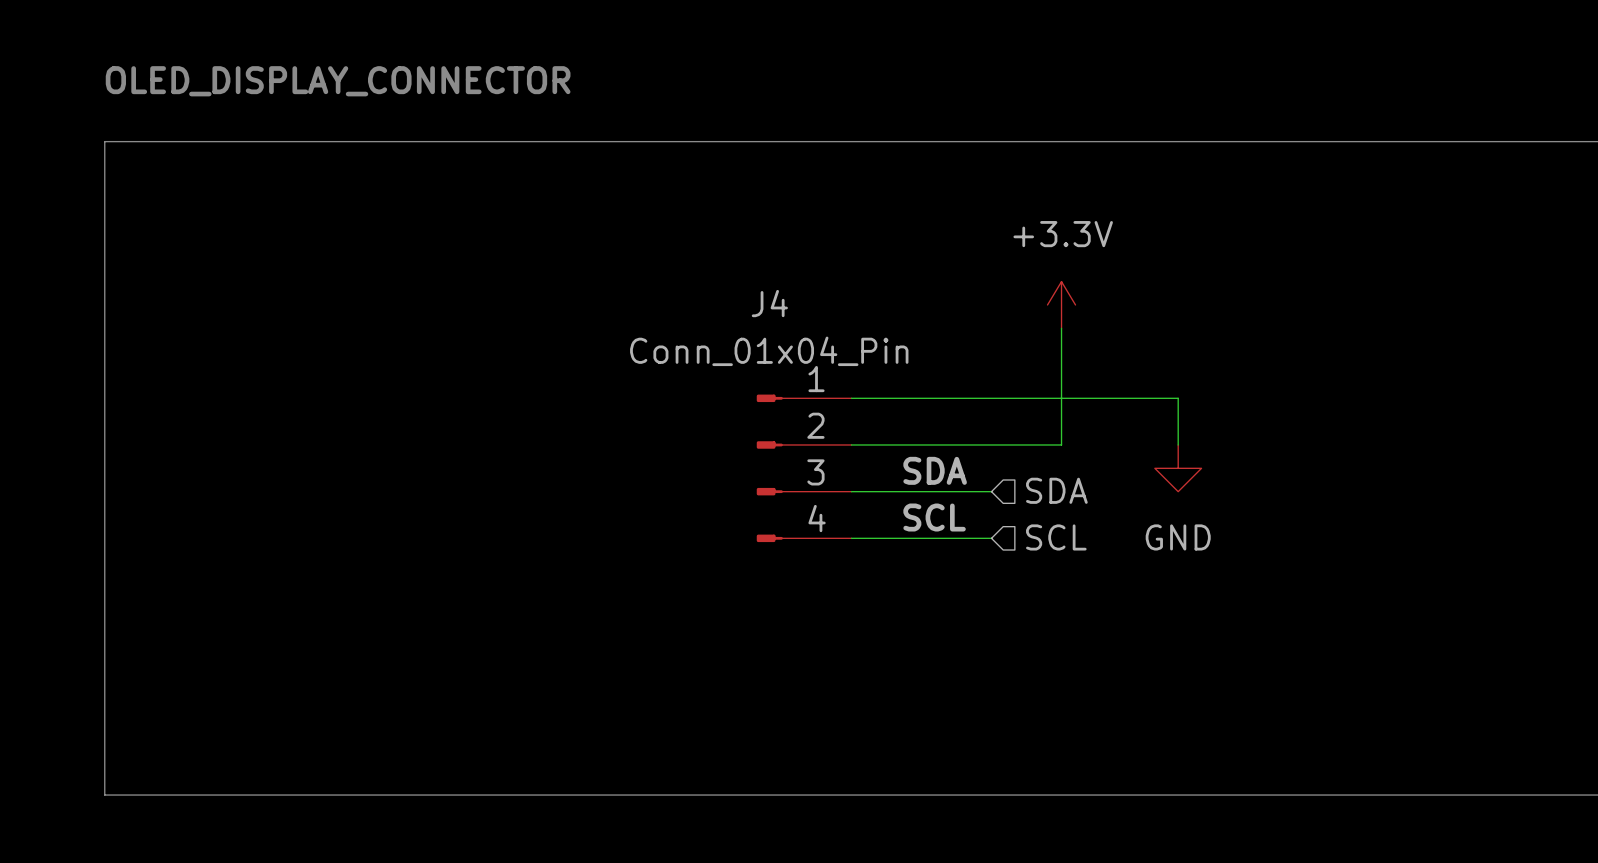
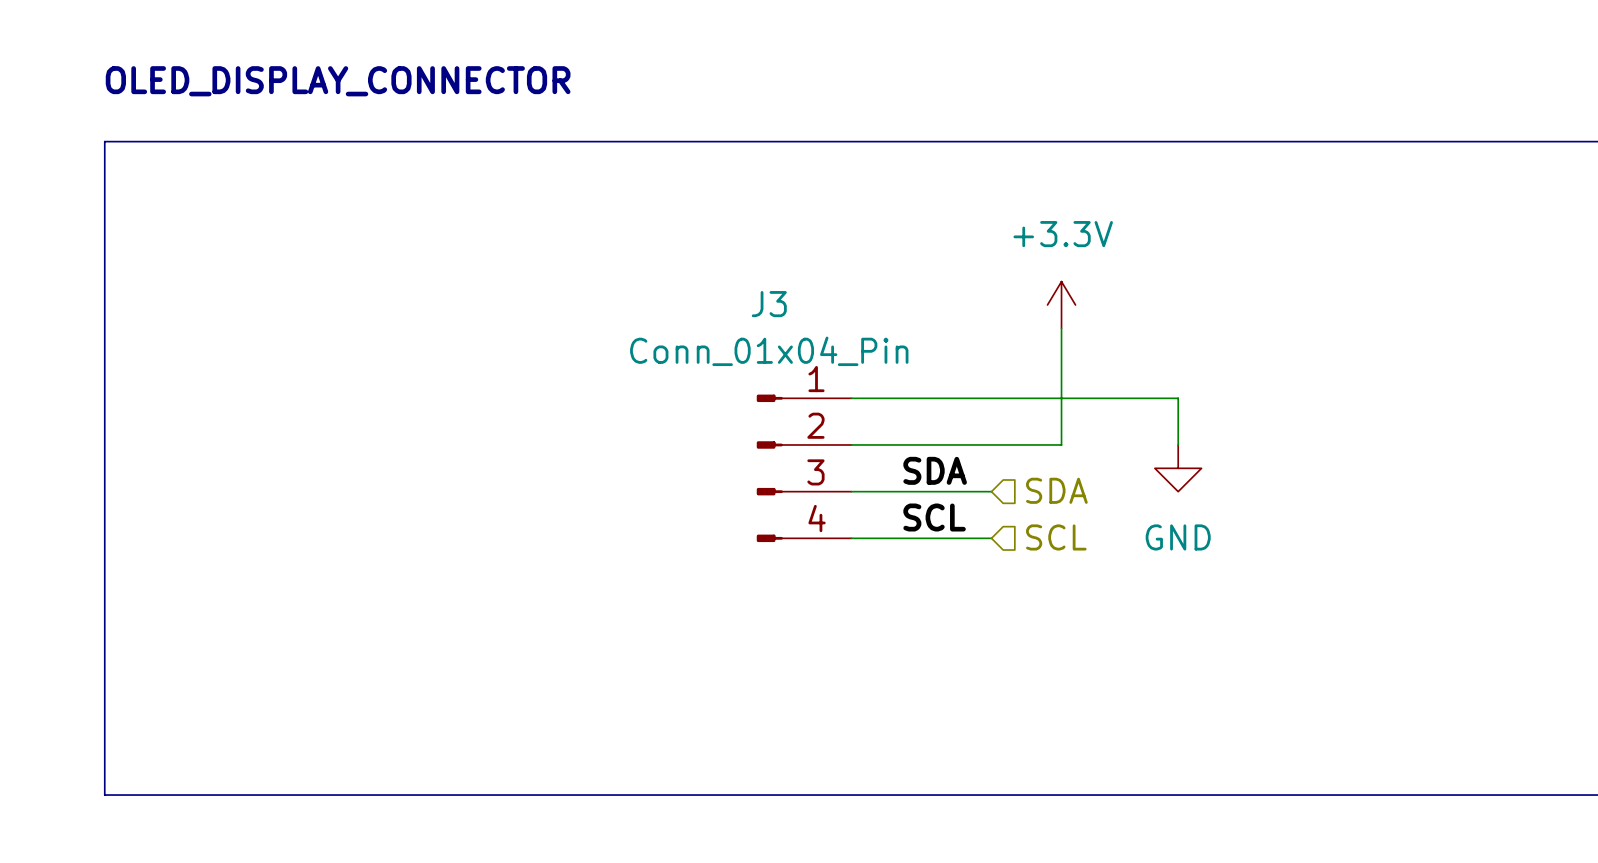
J4 name: J4 (769, 303) -> J3 (769, 304)

